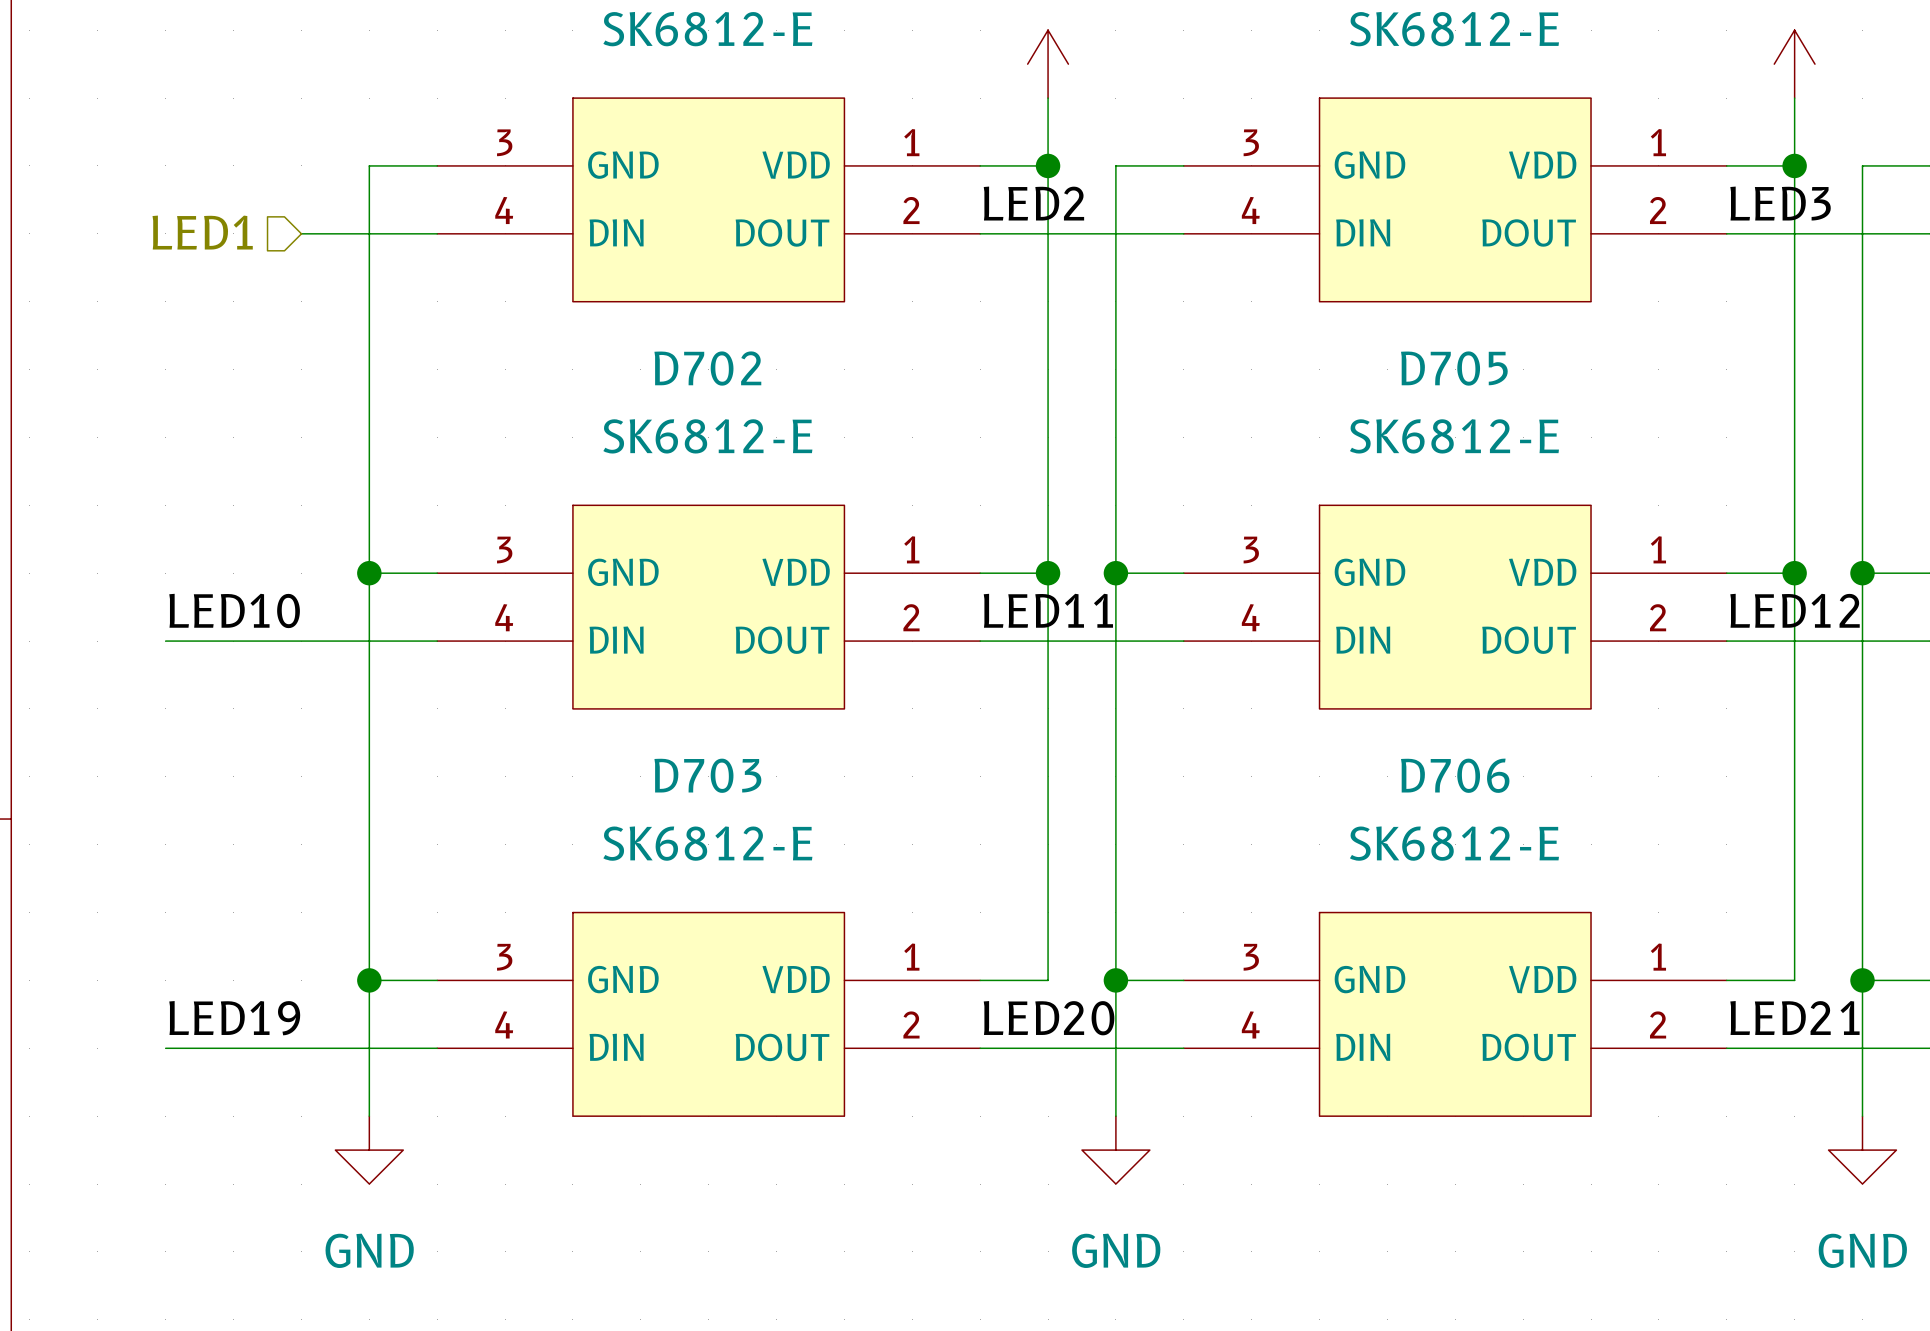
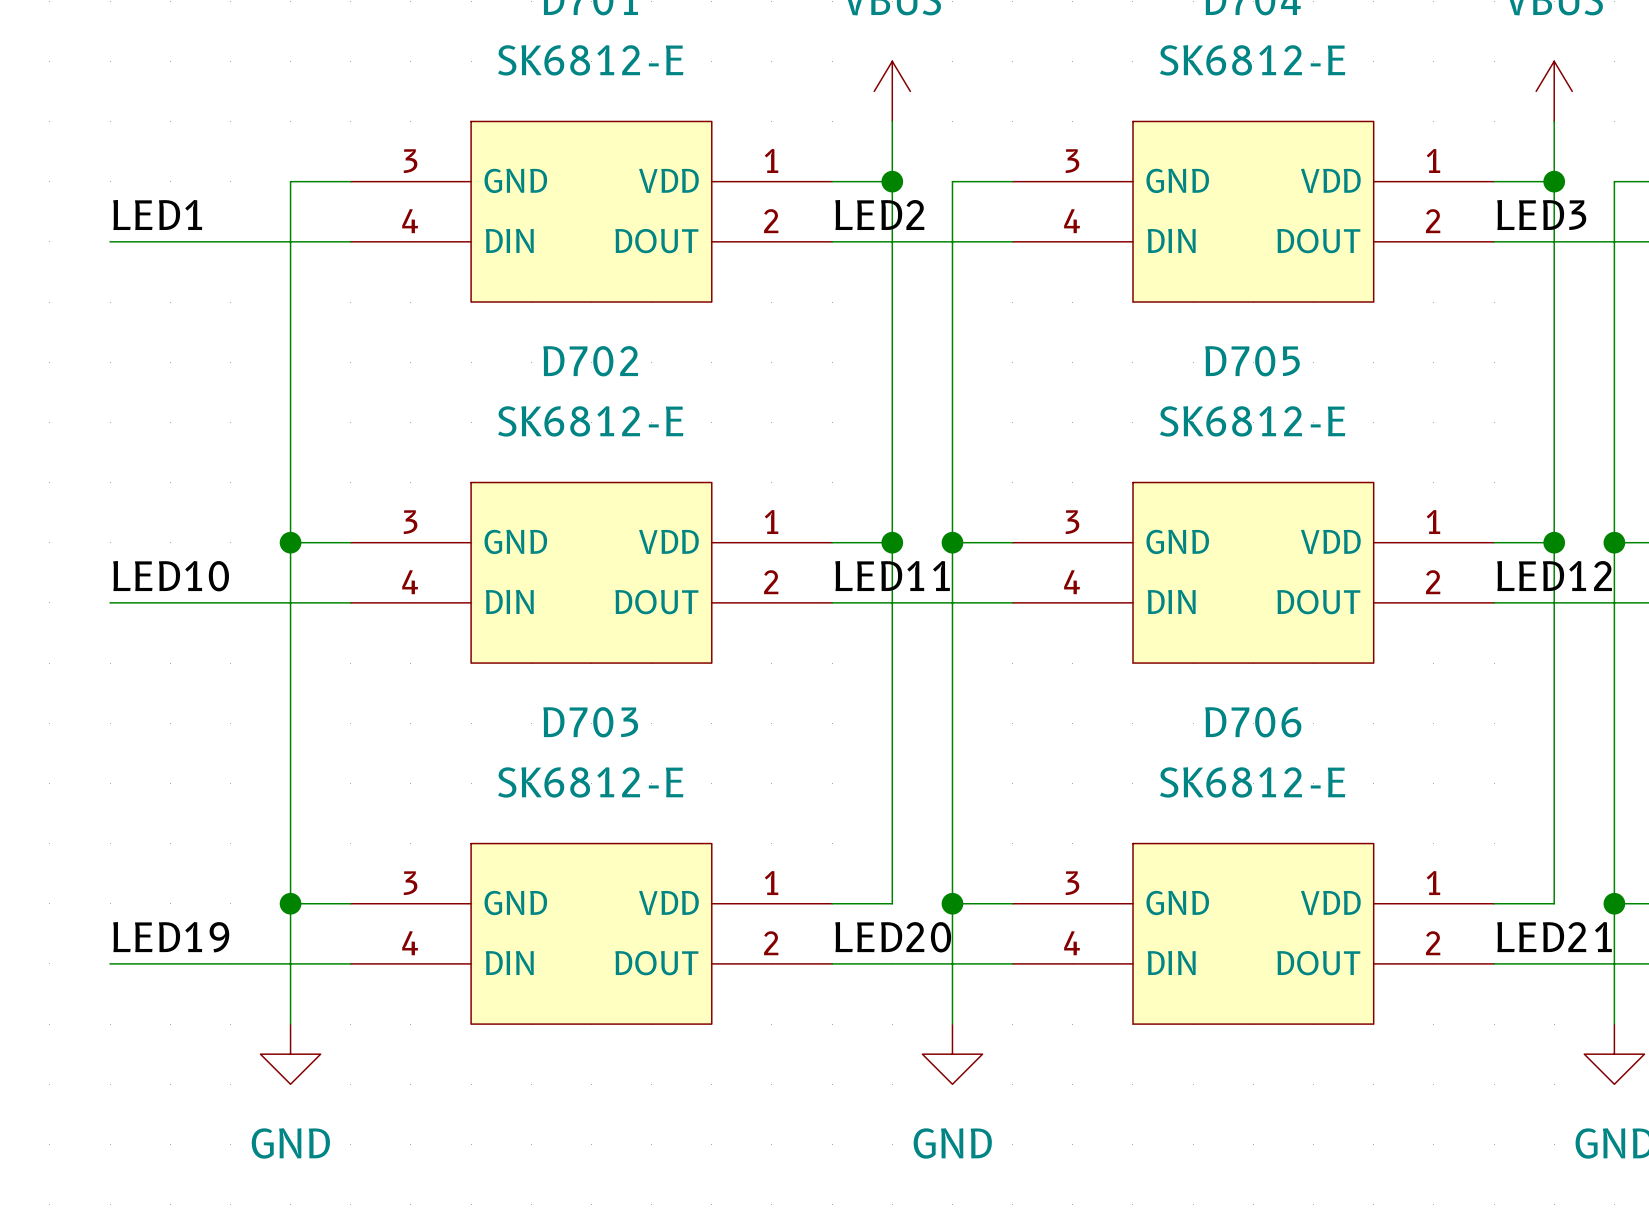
label: none -> LED1 (157, 214)
hierarchical label: LED1 (202, 232) -> none
wire: none -> (110, 241) (230, 241)

